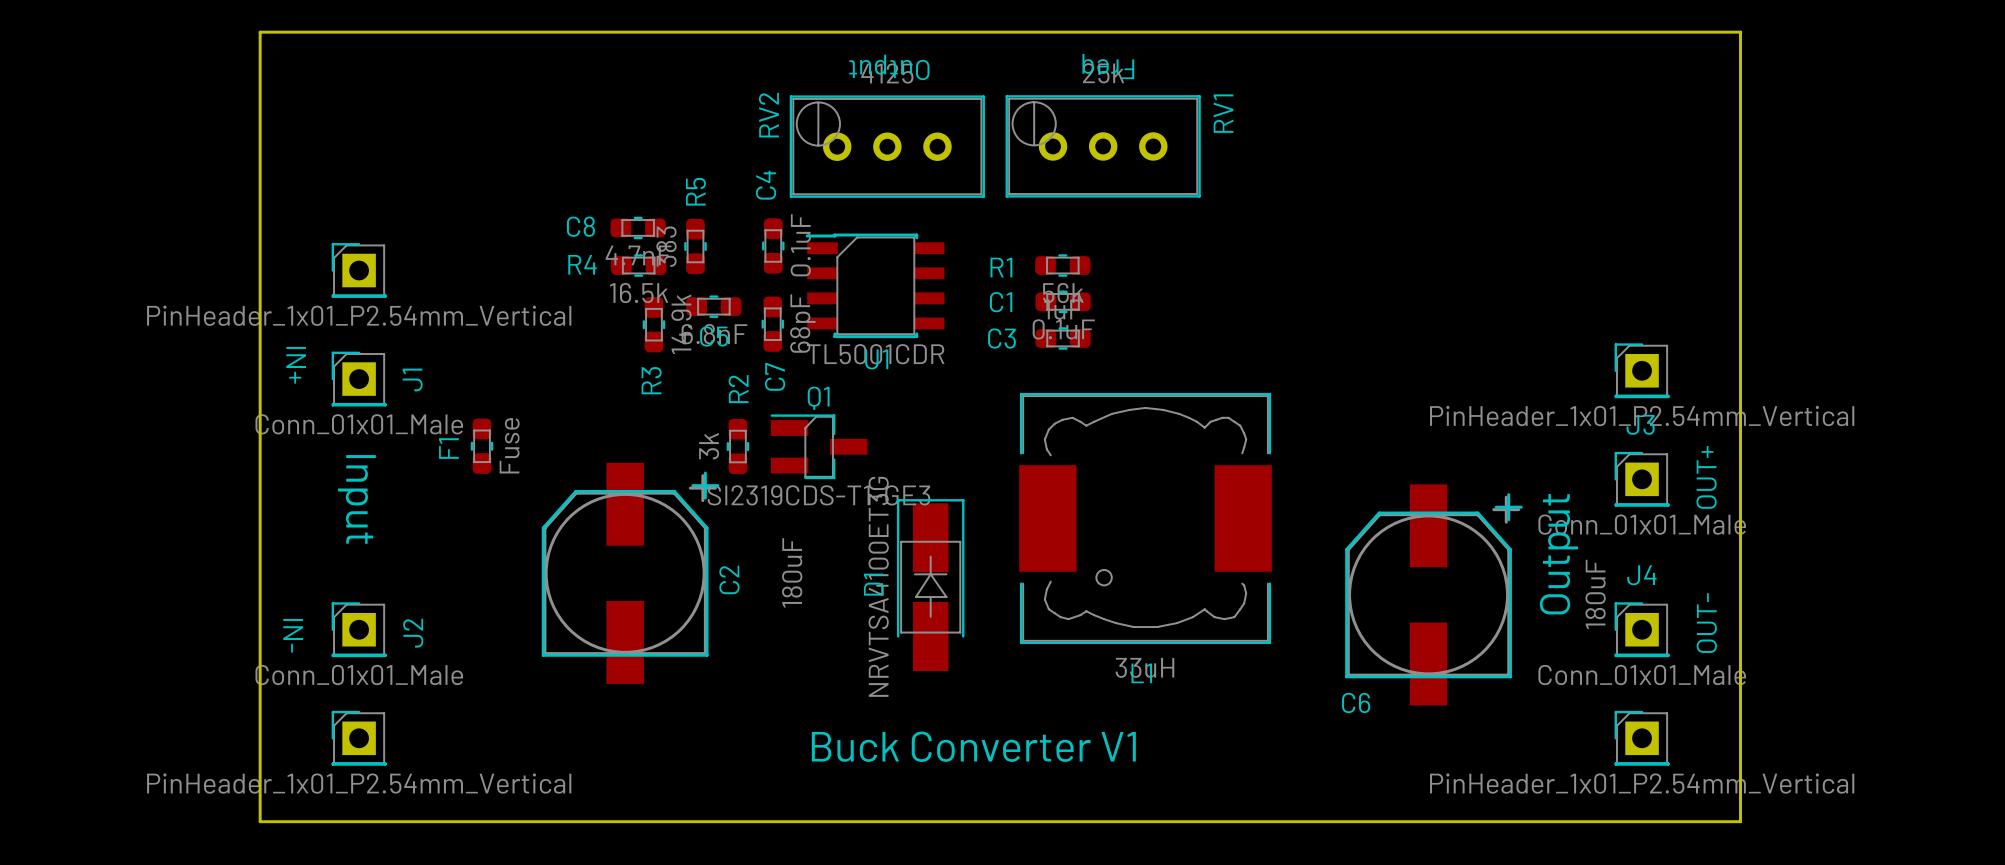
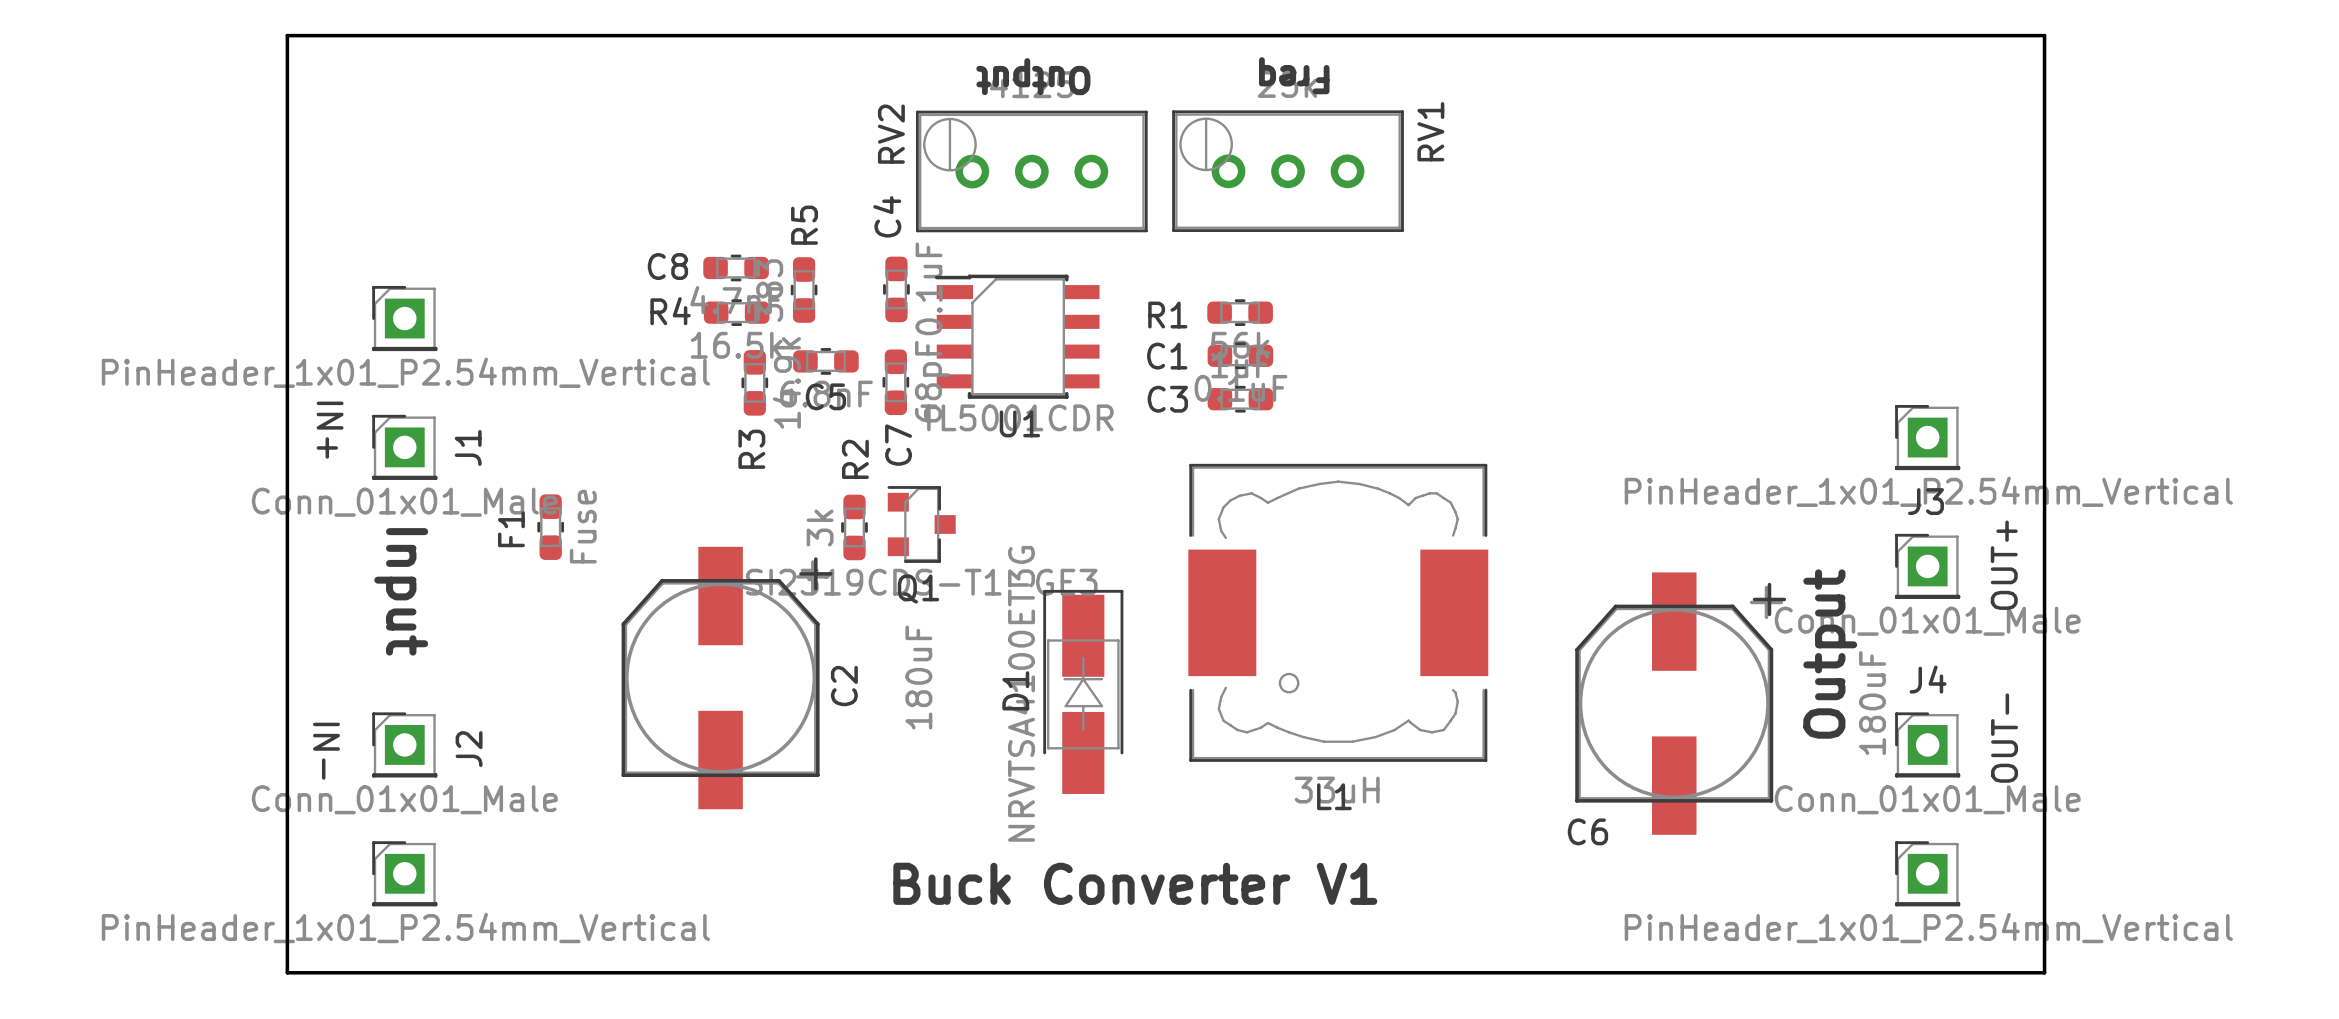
Q1 name position: Q1 (818, 398) -> Q1 (918, 589)
Q1 footprint: [770, 414, 868, 480] -> [887, 486, 956, 563]

